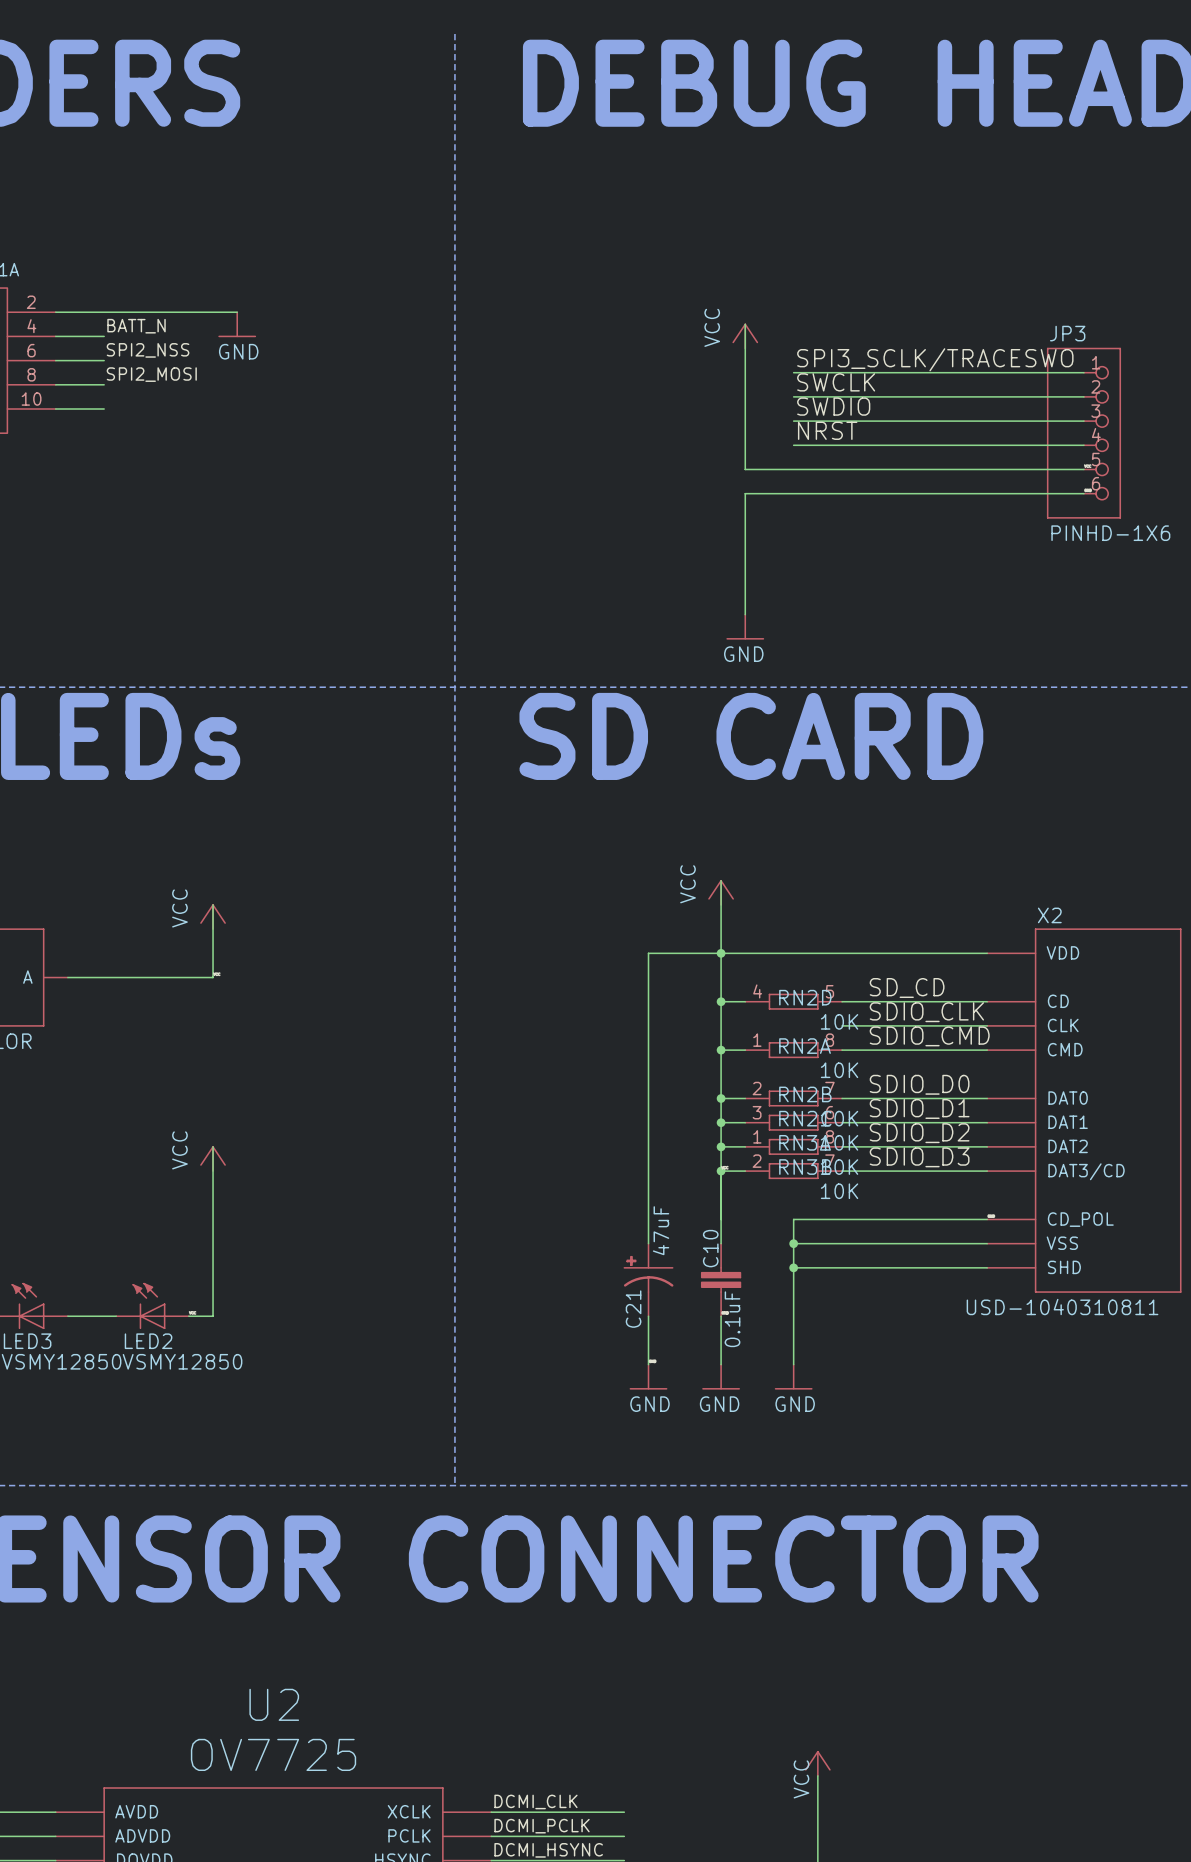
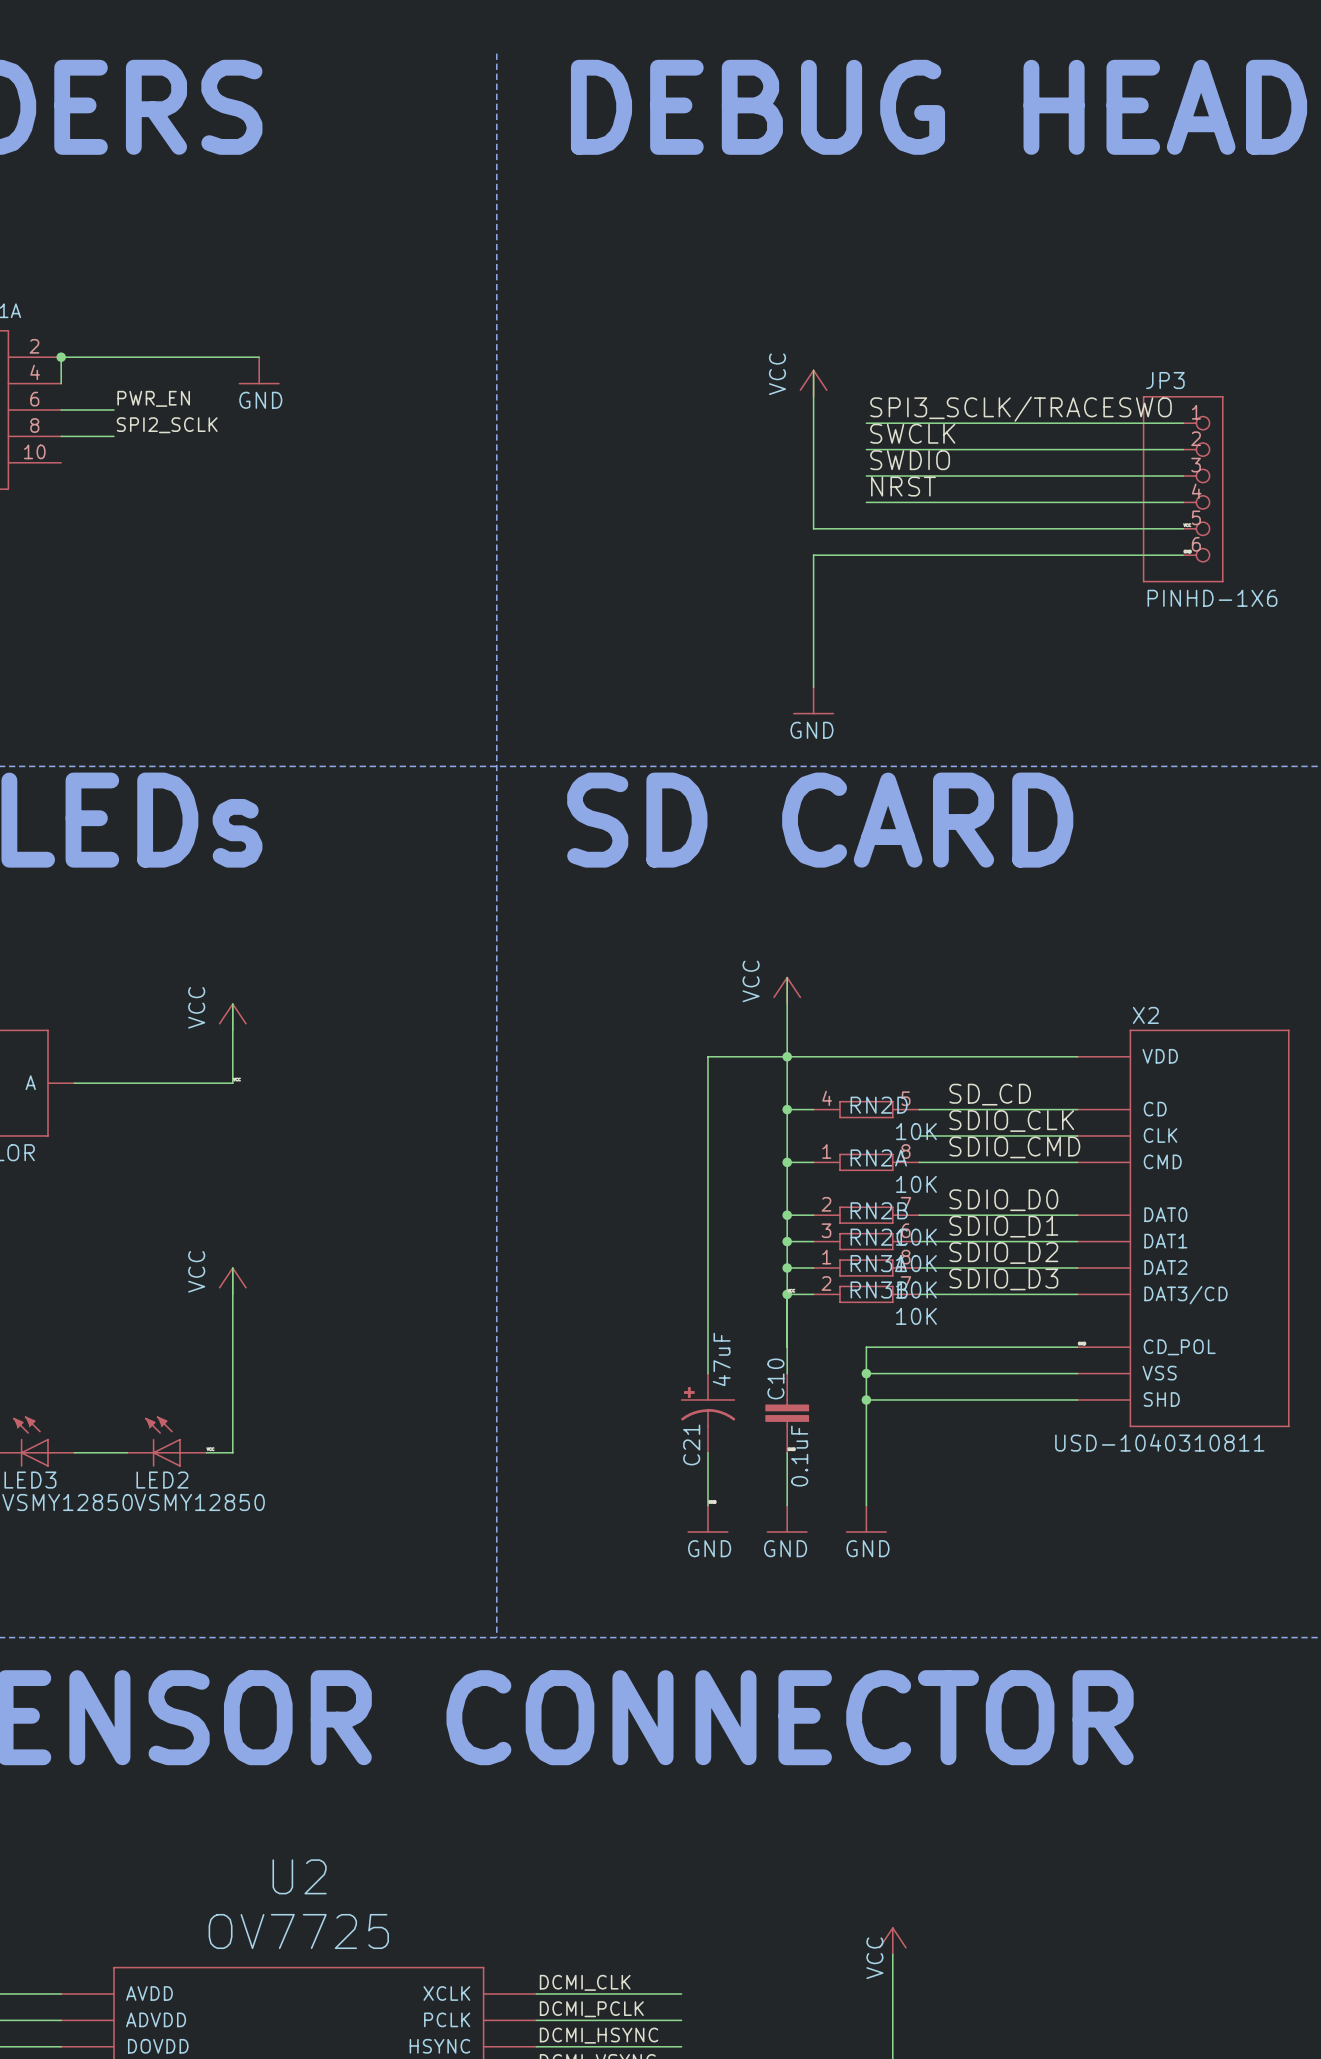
junction: none -> (61, 357)
label: BATT_N (136, 326) -> none
wire: (55, 336) (104, 336) -> (61, 383) (61, 357)
label: SPI2_NSS (148, 350) -> PWR_EN (153, 398)
label: SPI2_MOSI (151, 374) -> SPI2_SCLK (167, 425)
wire: (55, 409) (104, 409) -> none

